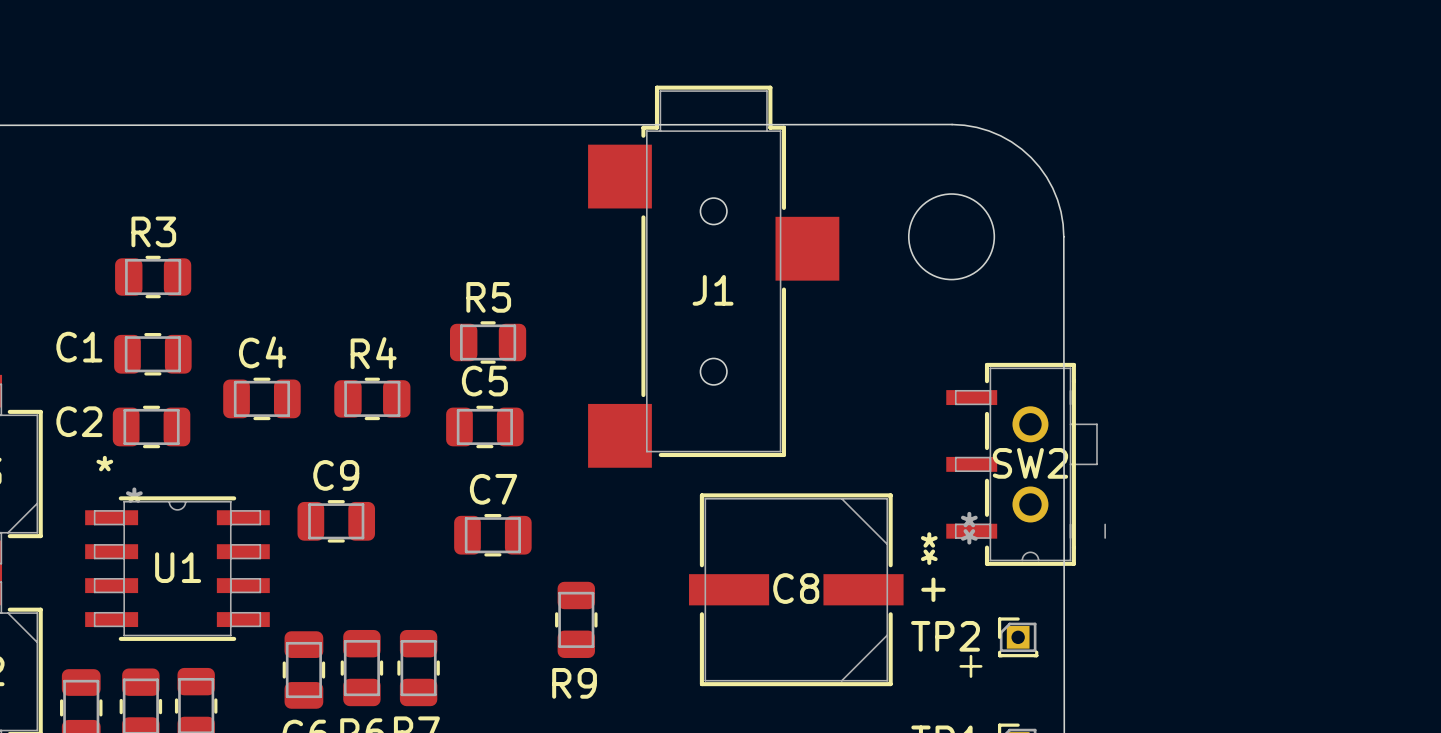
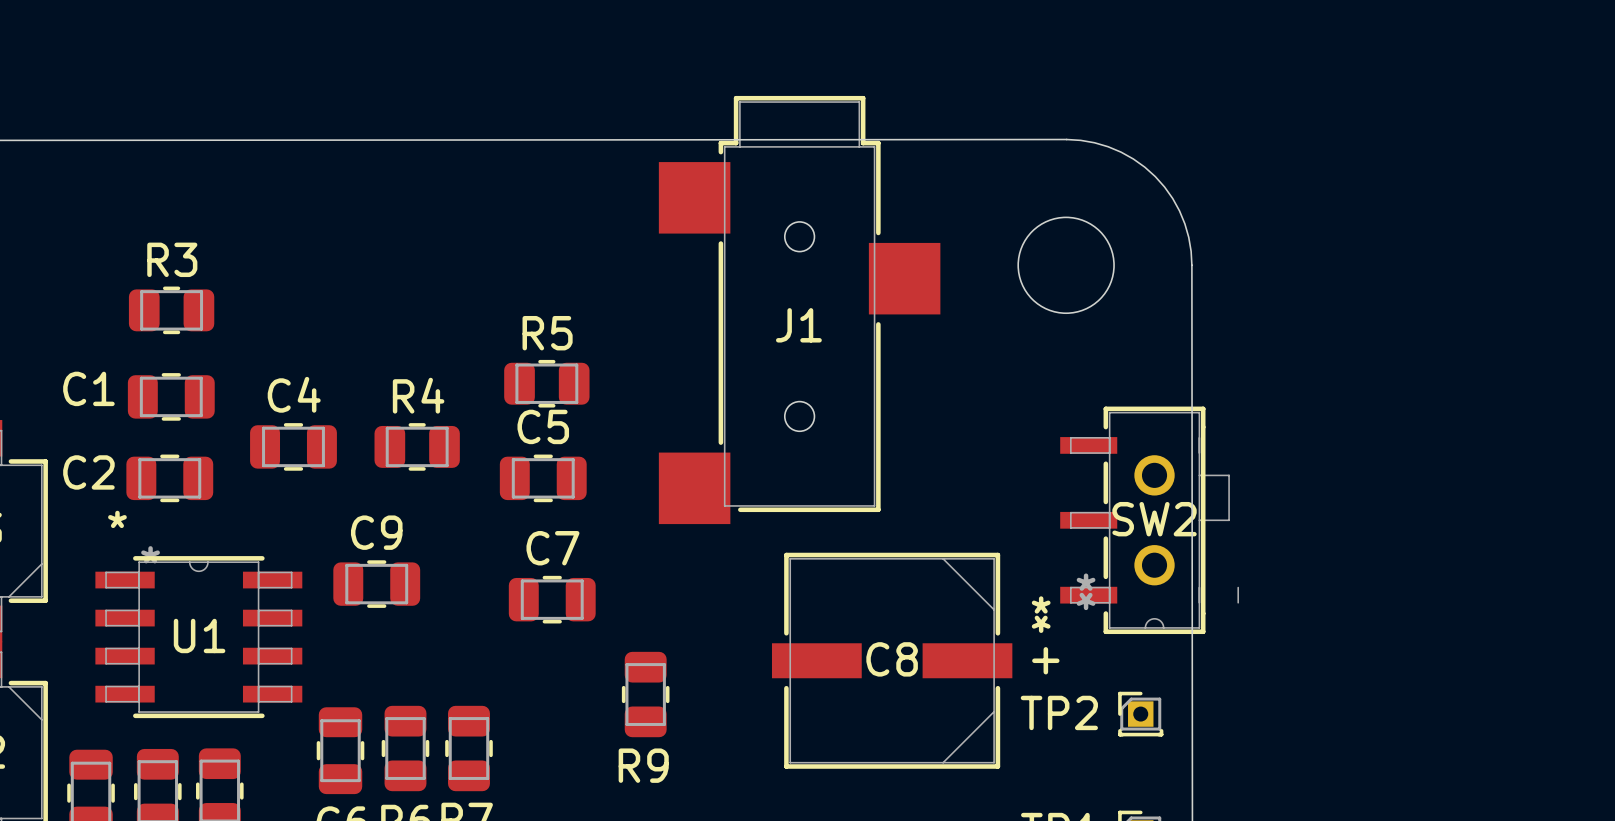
text: + (970, 666) -> none

